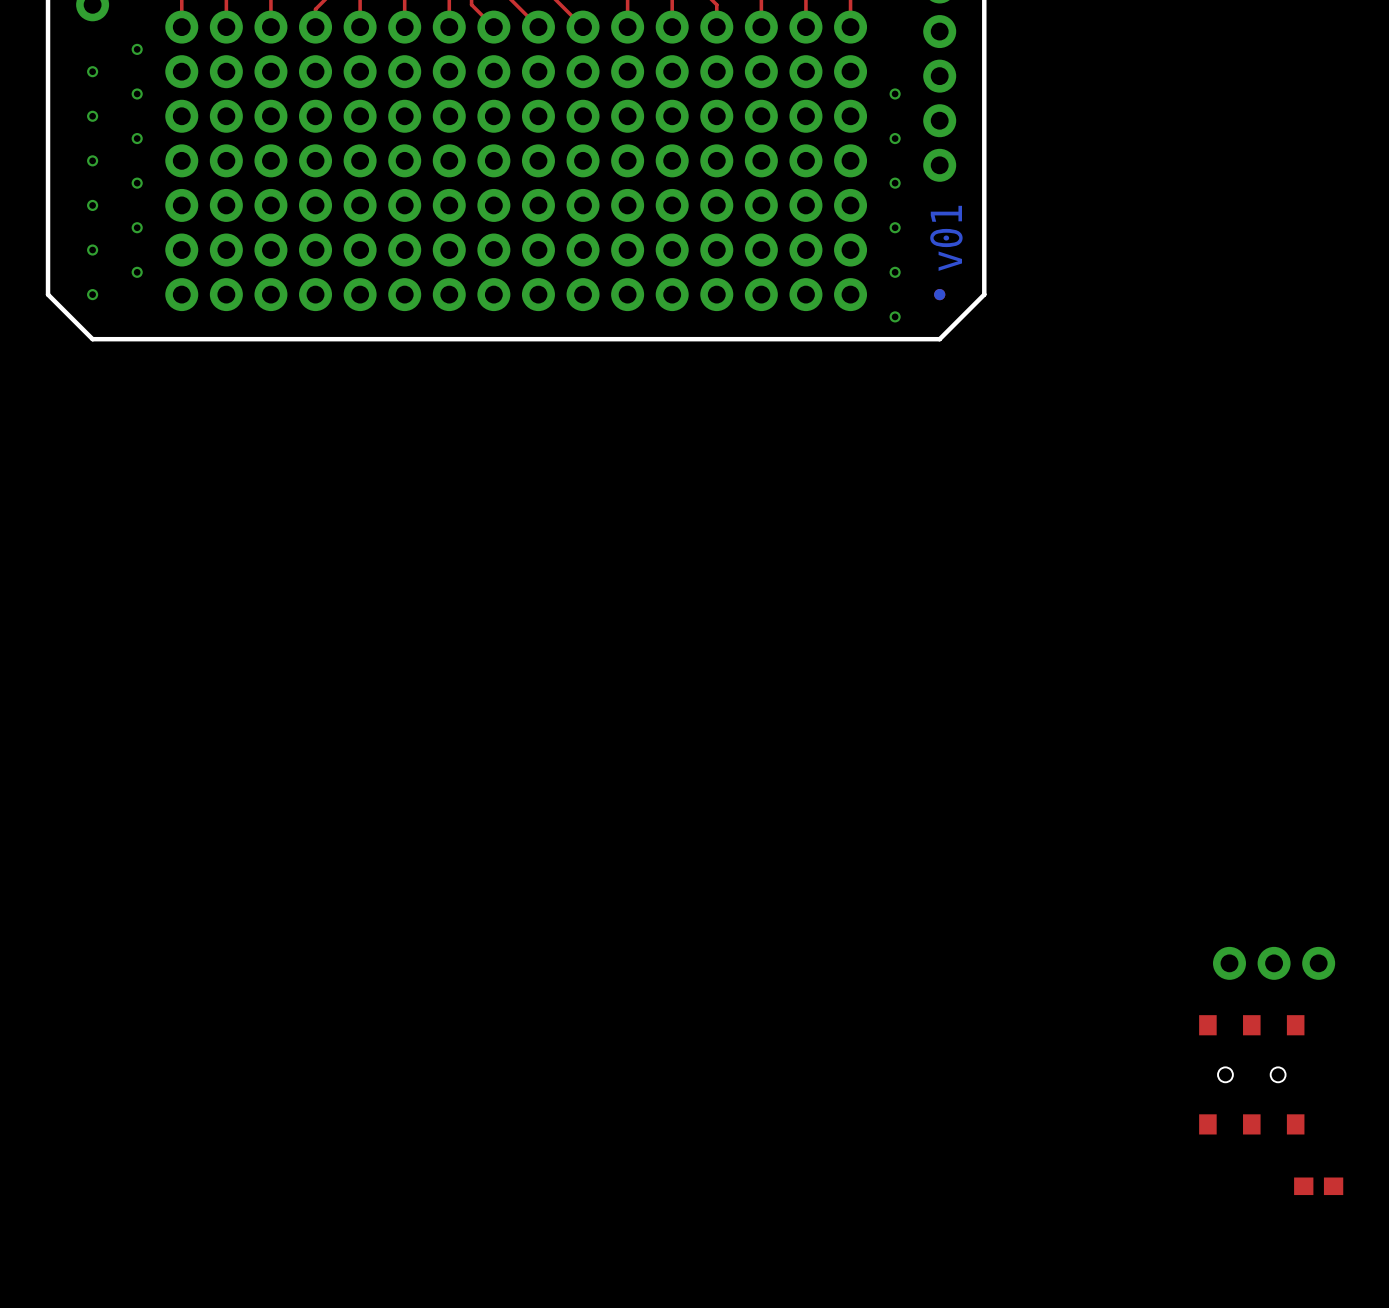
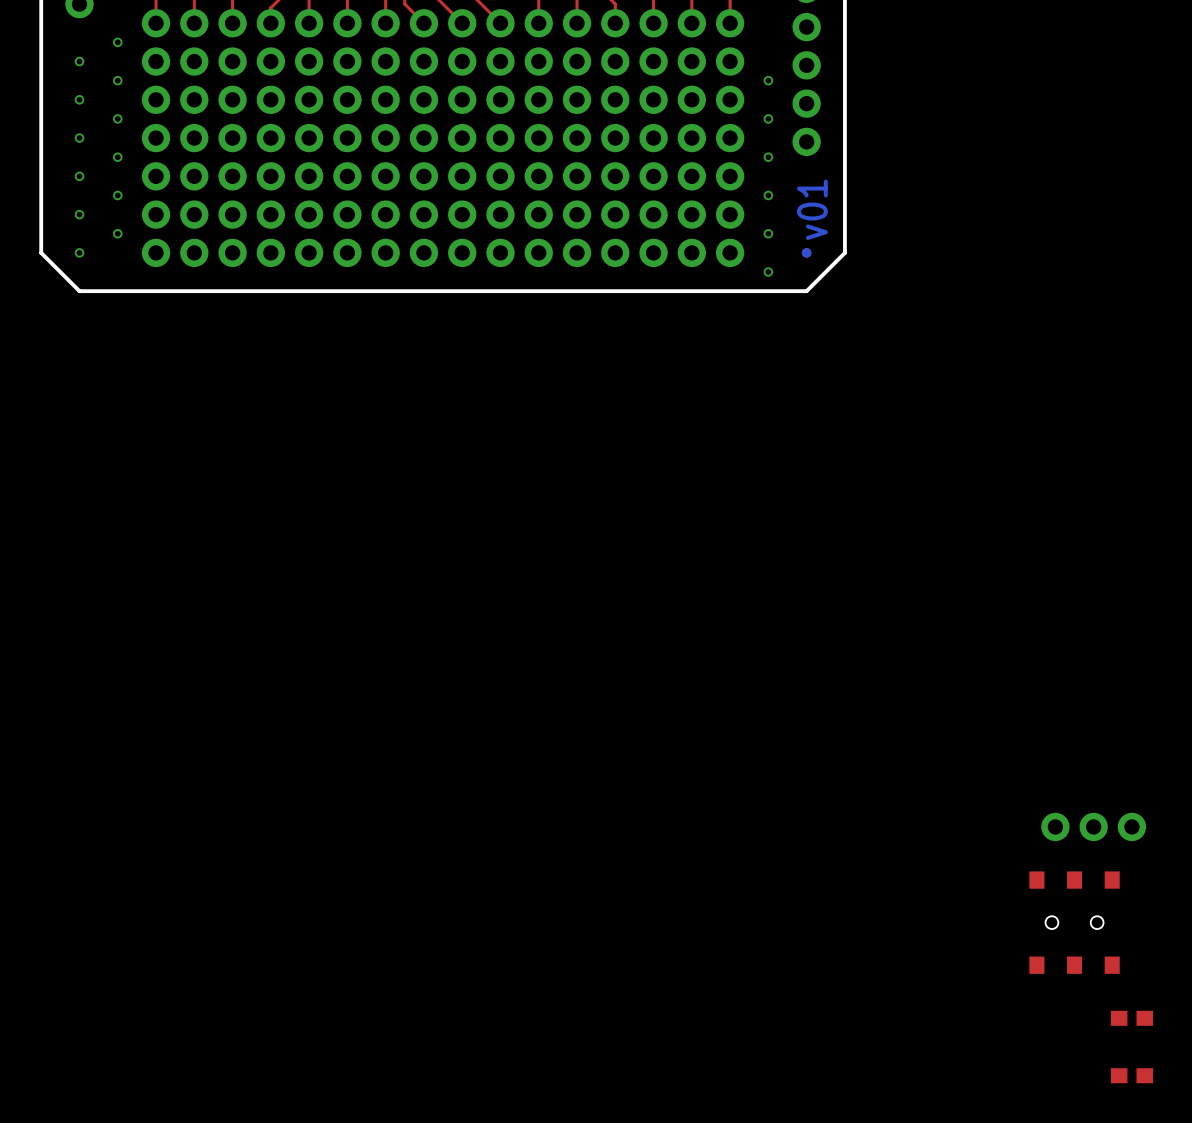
part: none -> (1131, 1075)

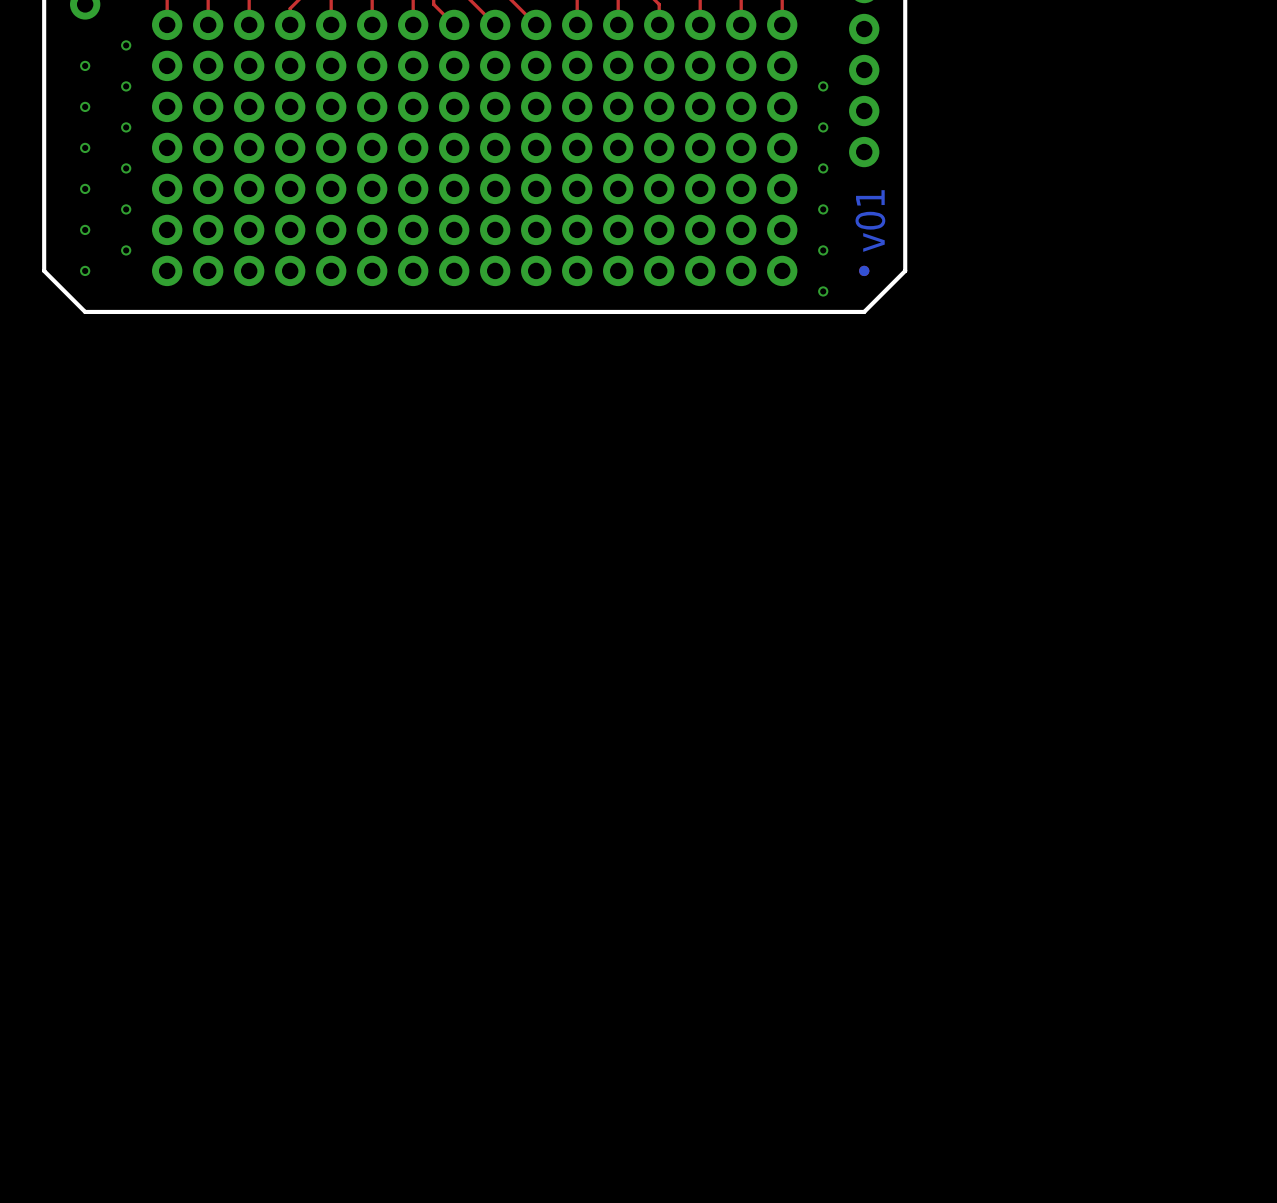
part: (1093, 826) -> none
part: (1074, 922) -> none
part: (1131, 1018) -> none
part: (1131, 1075) -> none

